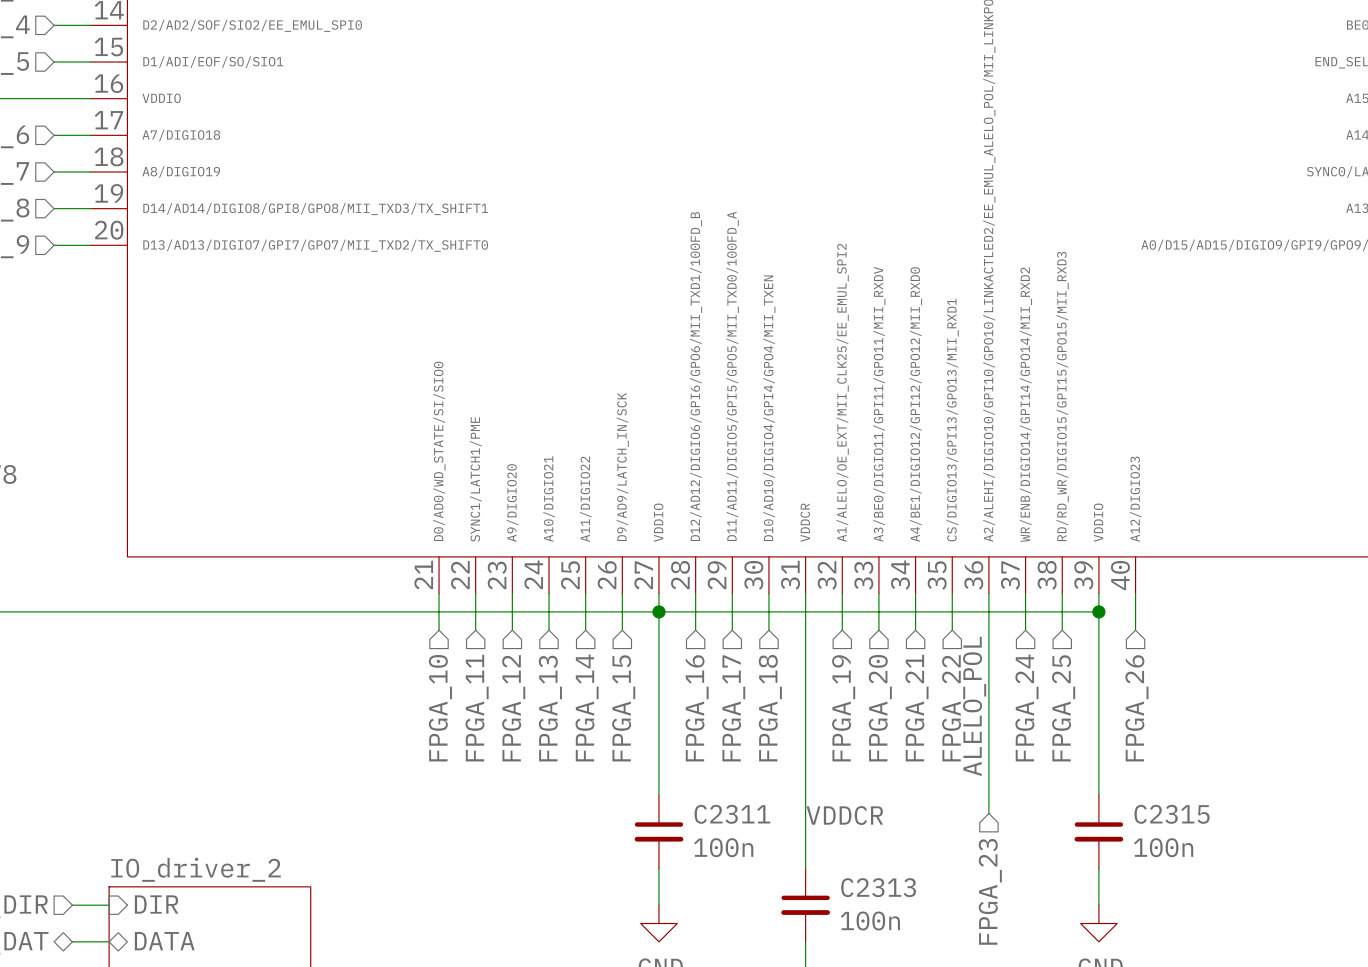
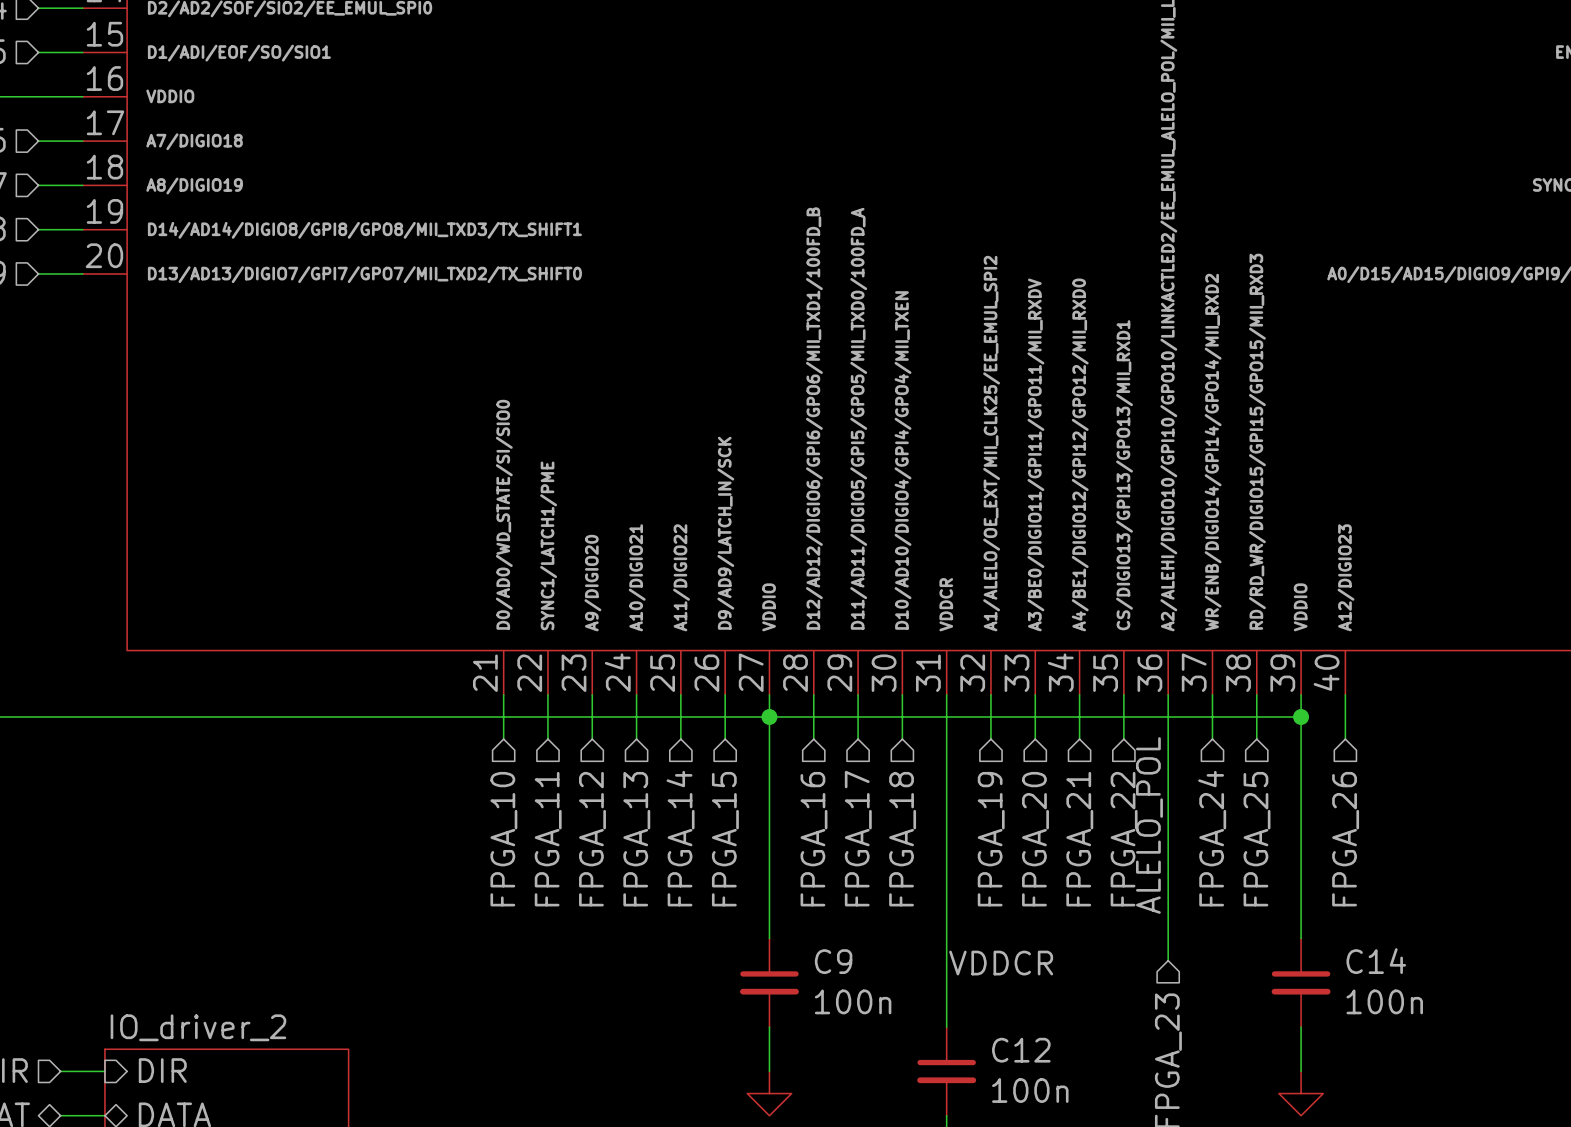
C2311 name: C2311 (732, 814) -> C9 (833, 961)
C2315 name: C2315 (1172, 814) -> C14 (1376, 961)
C2313 name: C2313 (878, 887) -> C12 (1021, 1050)

